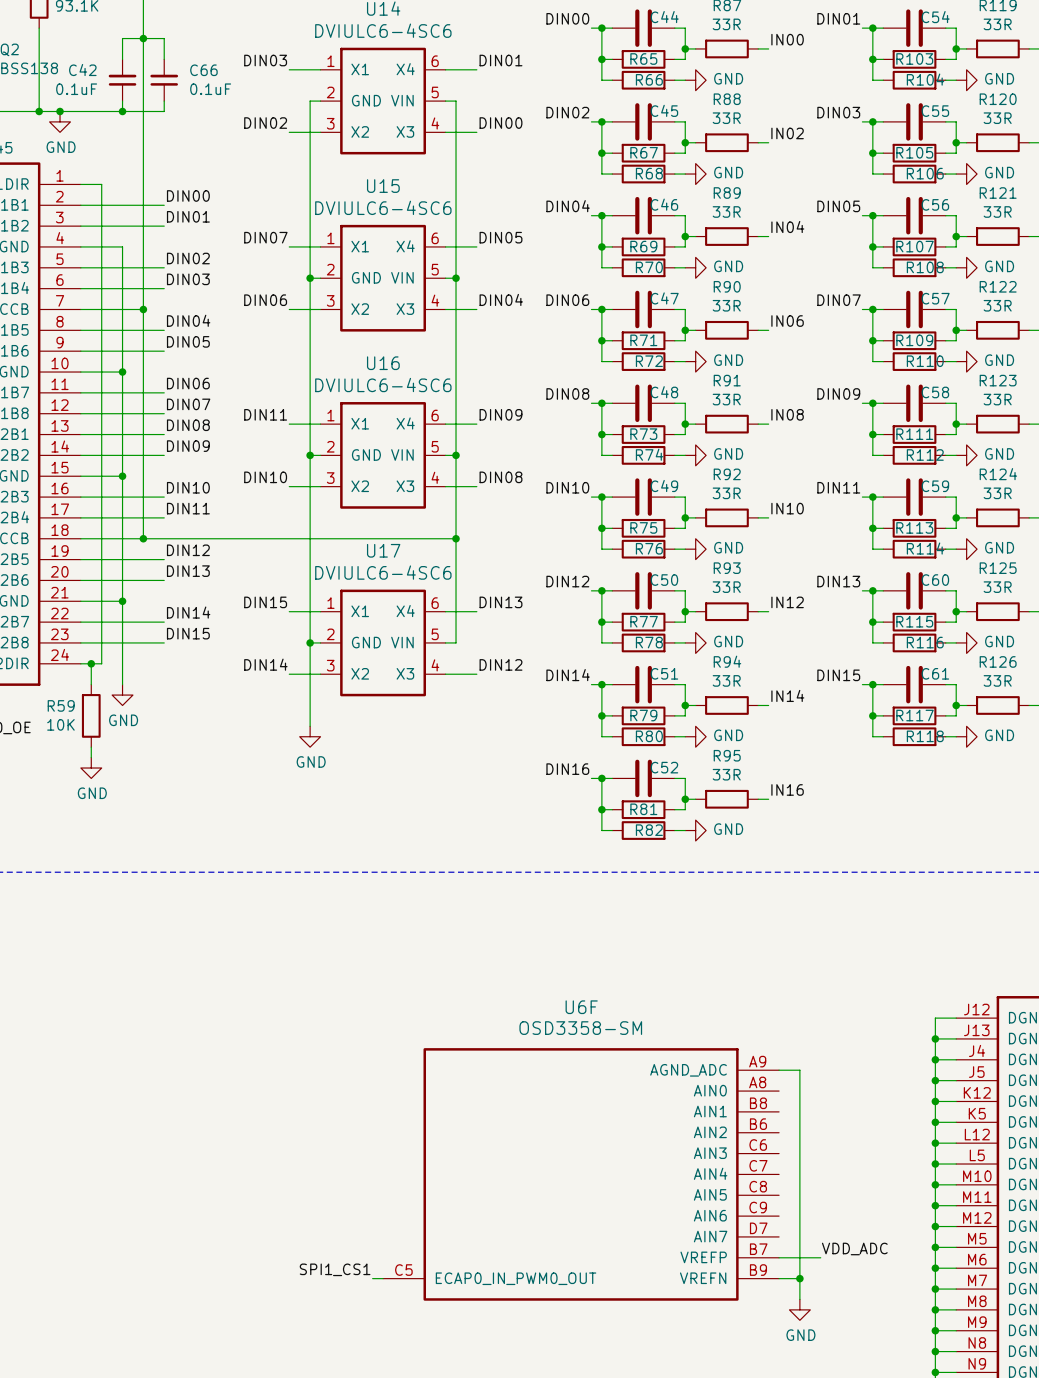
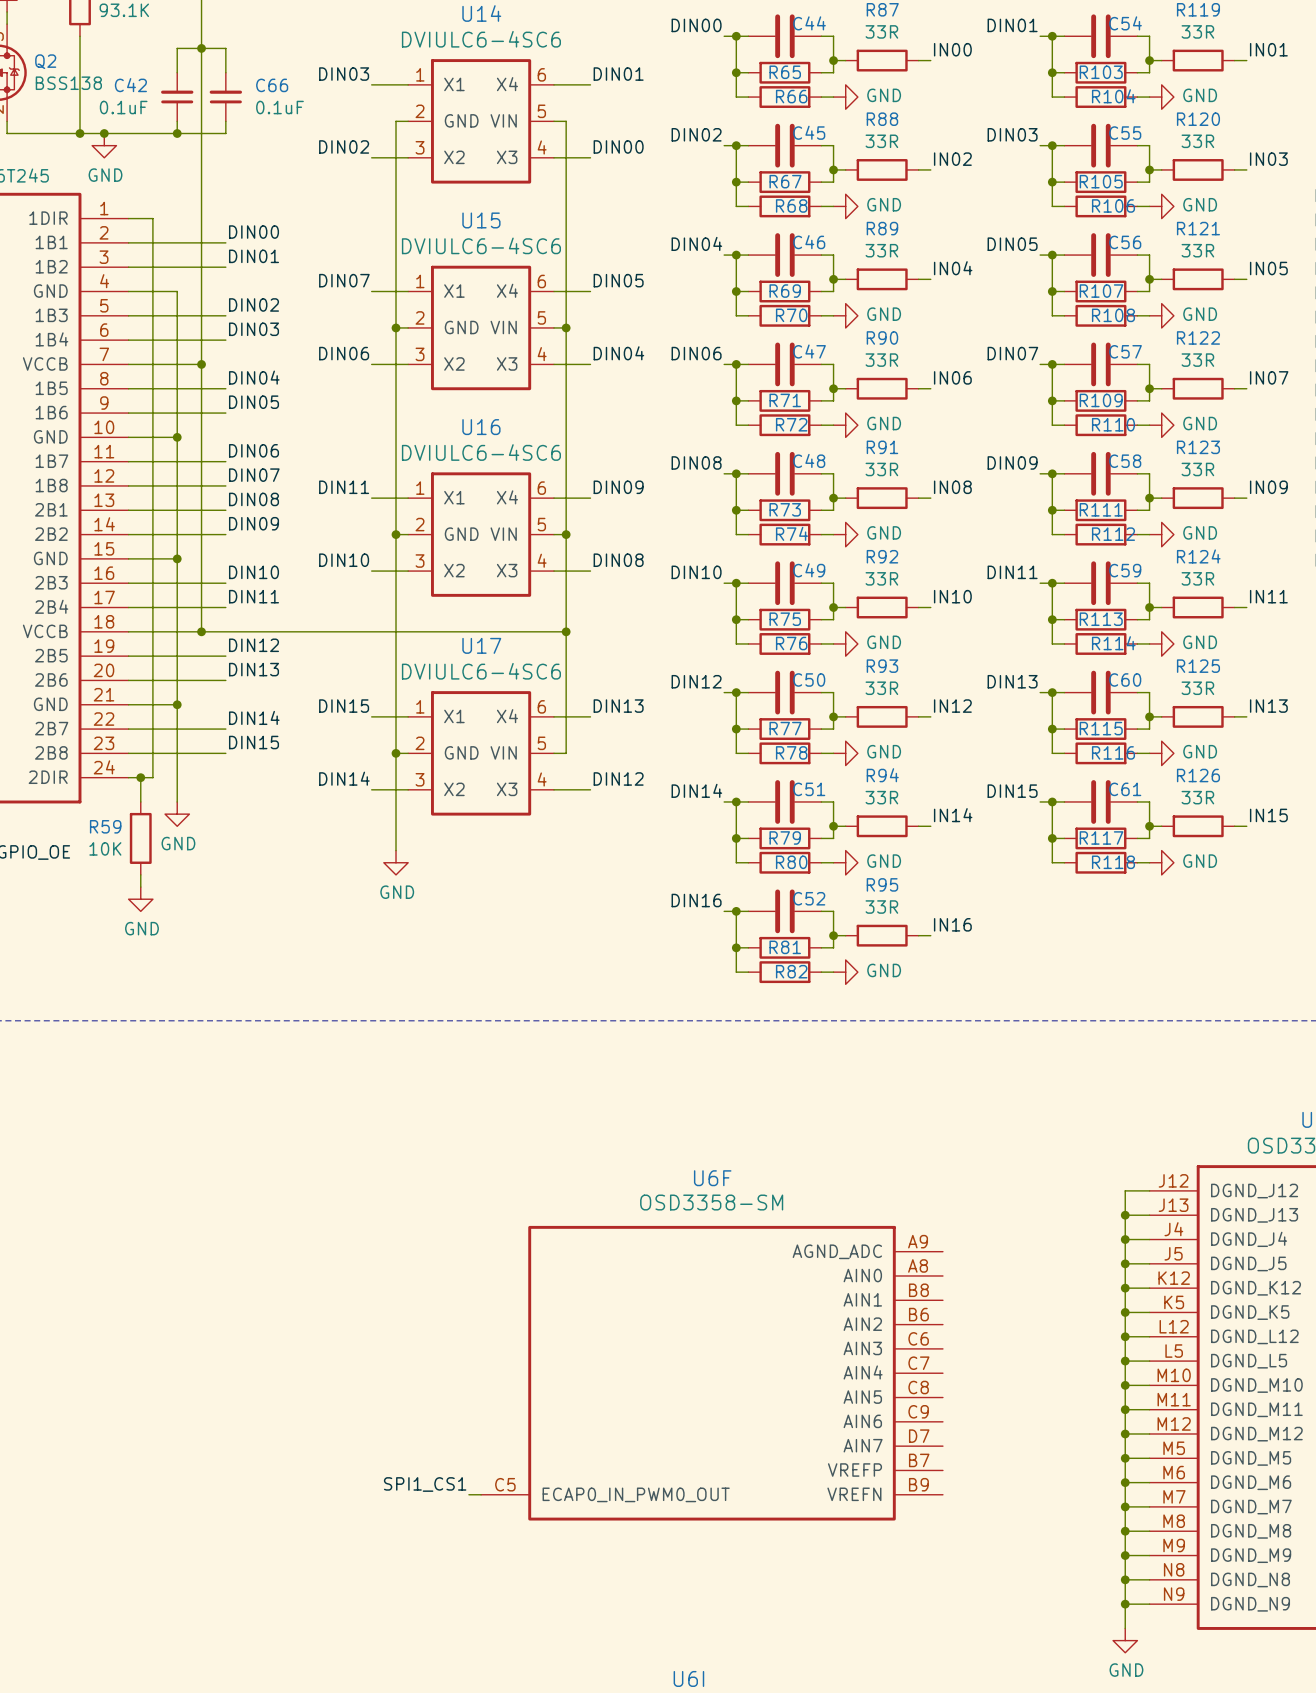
wire: (779, 1070) (799, 1070) (799, 1299) -> none
label: VDD_ADC (854, 1248) -> none
wire: (779, 1257) (820, 1257) -> none
wire: (779, 1278) (799, 1278) -> none
junction: (799, 1278) -> none
power symbol: GND (799, 1309) -> none

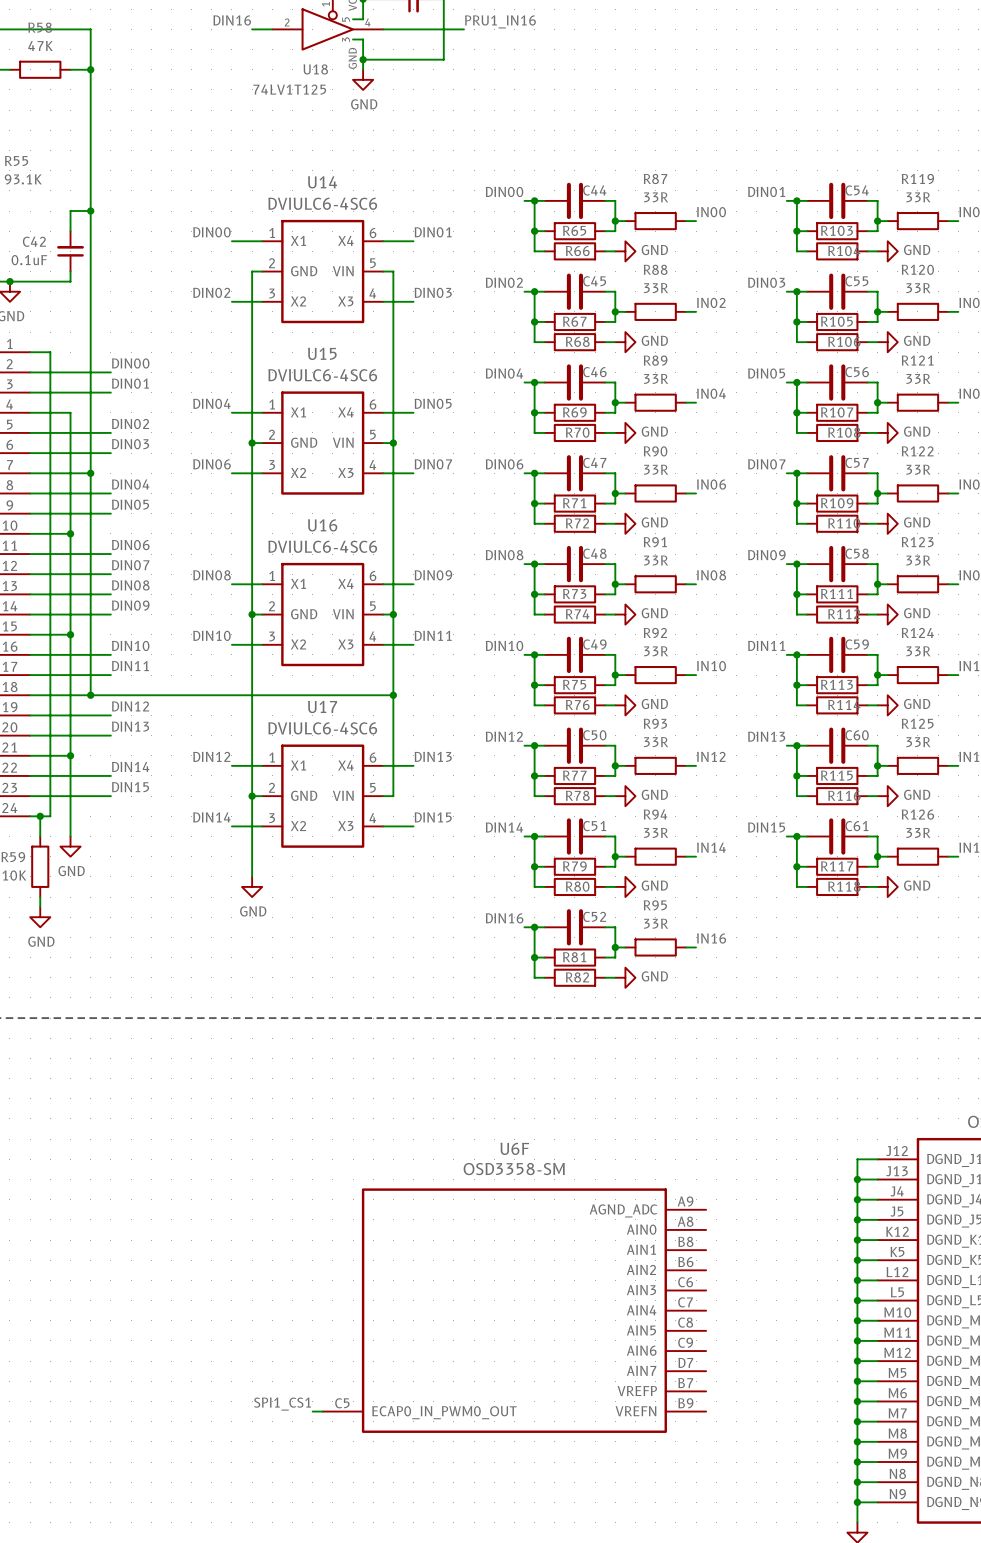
wire: (201, 48) (225, 48) (225, 72) -> none
label: DIN03 (344, 74) -> DIN00 (211, 232)
C66: 0.1uF (225, 97) -> none
wire: (225, 121) (225, 133) (177, 133) -> none
junction: (177, 133) -> none
label: DIN00 (618, 146) -> DIN03 (433, 292)
label: DIN07 (344, 280) -> DIN04 (211, 403)
label: DIN04 (618, 353) -> DIN07 (433, 464)
label: DIN11 (344, 487) -> DIN08 (212, 575)
label: DIN08 (618, 560) -> DIN11 (433, 635)
label: DIN15 (344, 706) -> DIN12 (211, 756)
label: DIN12 (618, 778) -> DIN15 (433, 817)

